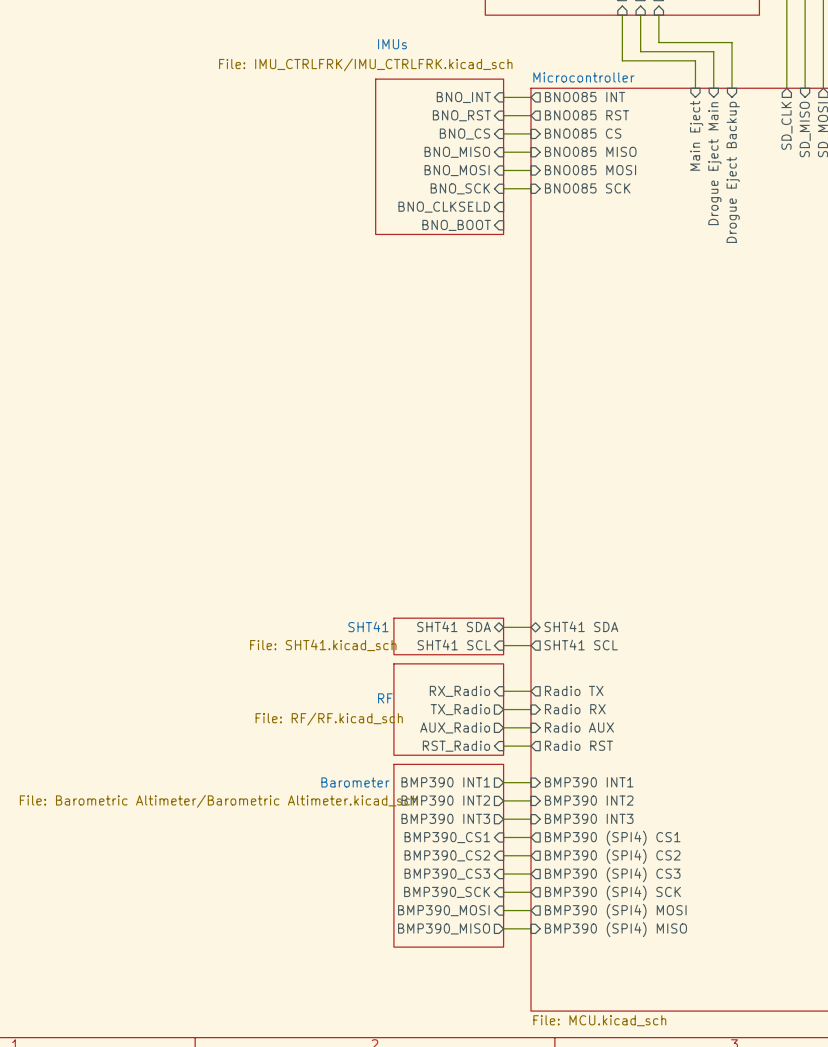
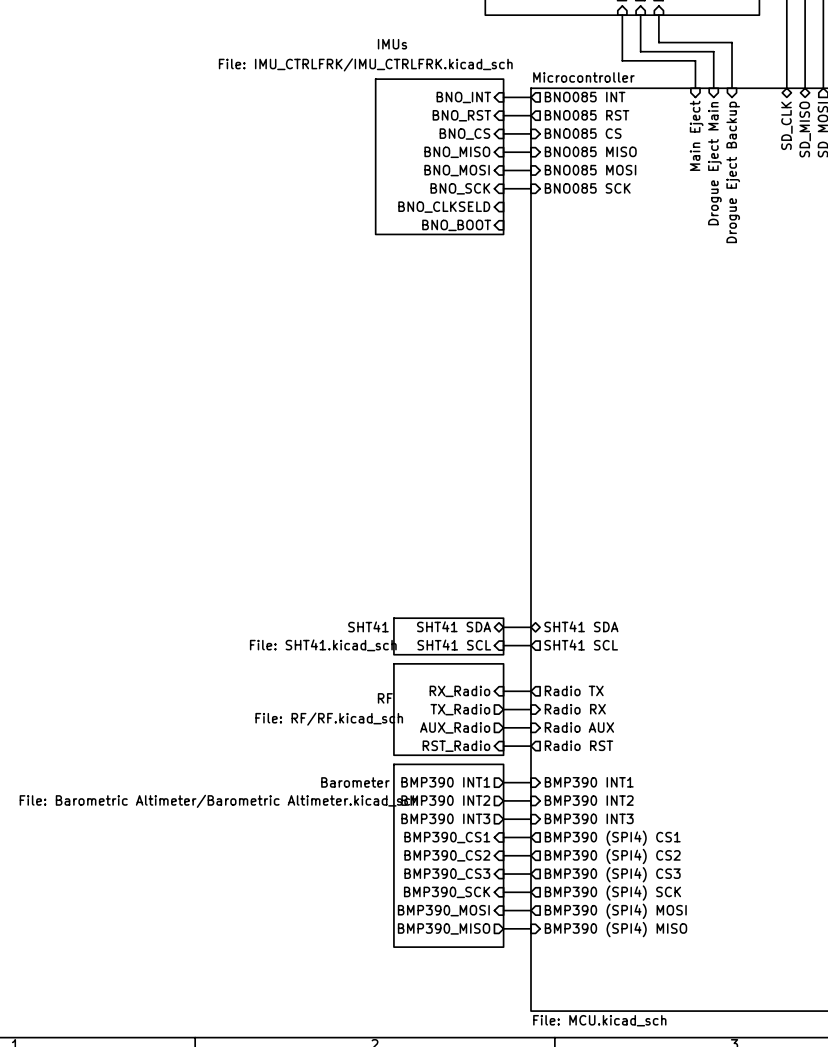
sheet pin shape: output (786, 125) -> bidirectional (786, 125)
sheet pin shape: input (805, 129) -> bidirectional (805, 129)

